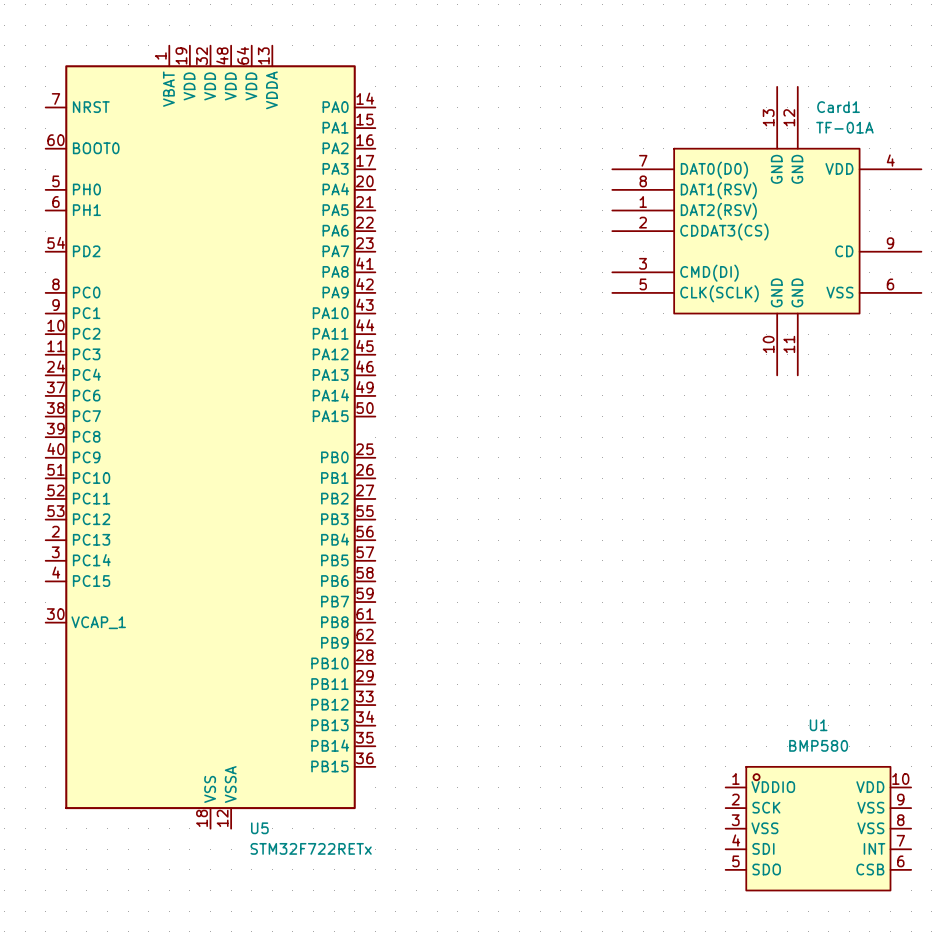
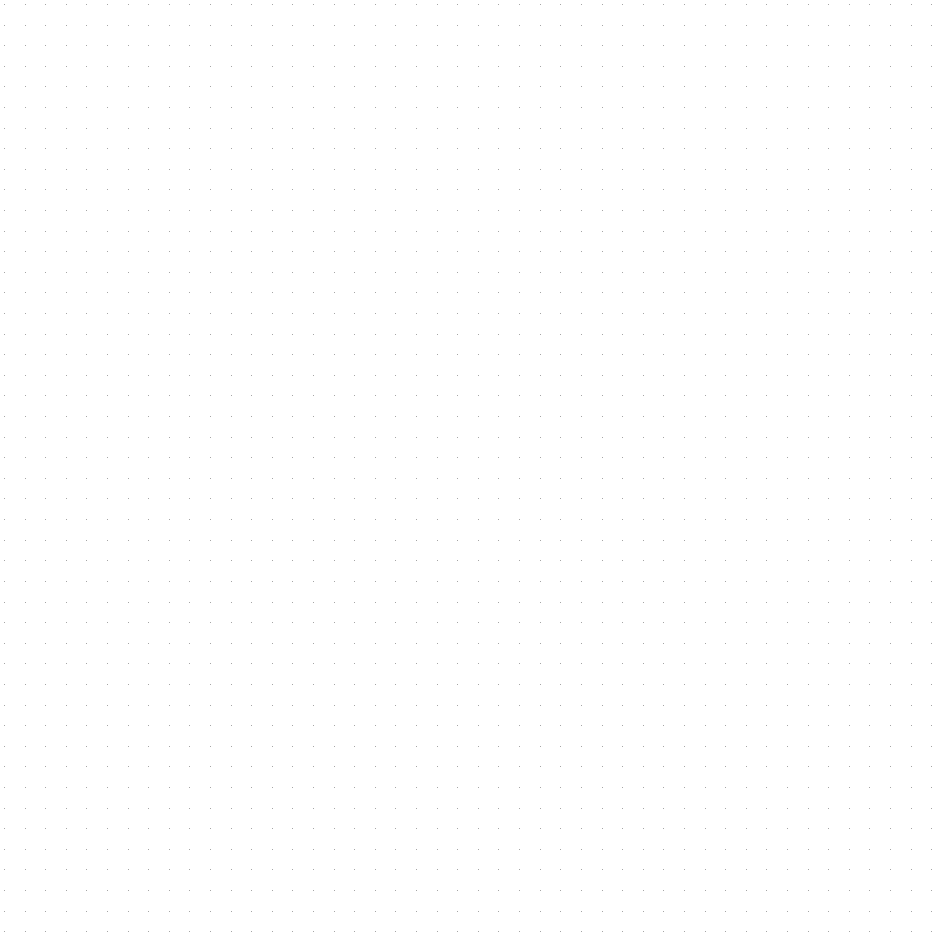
Card1: TF-01A (766, 231) -> none
U5: STM32F722RETx (210, 437) -> none
U1: BMP580 (818, 828) -> none

